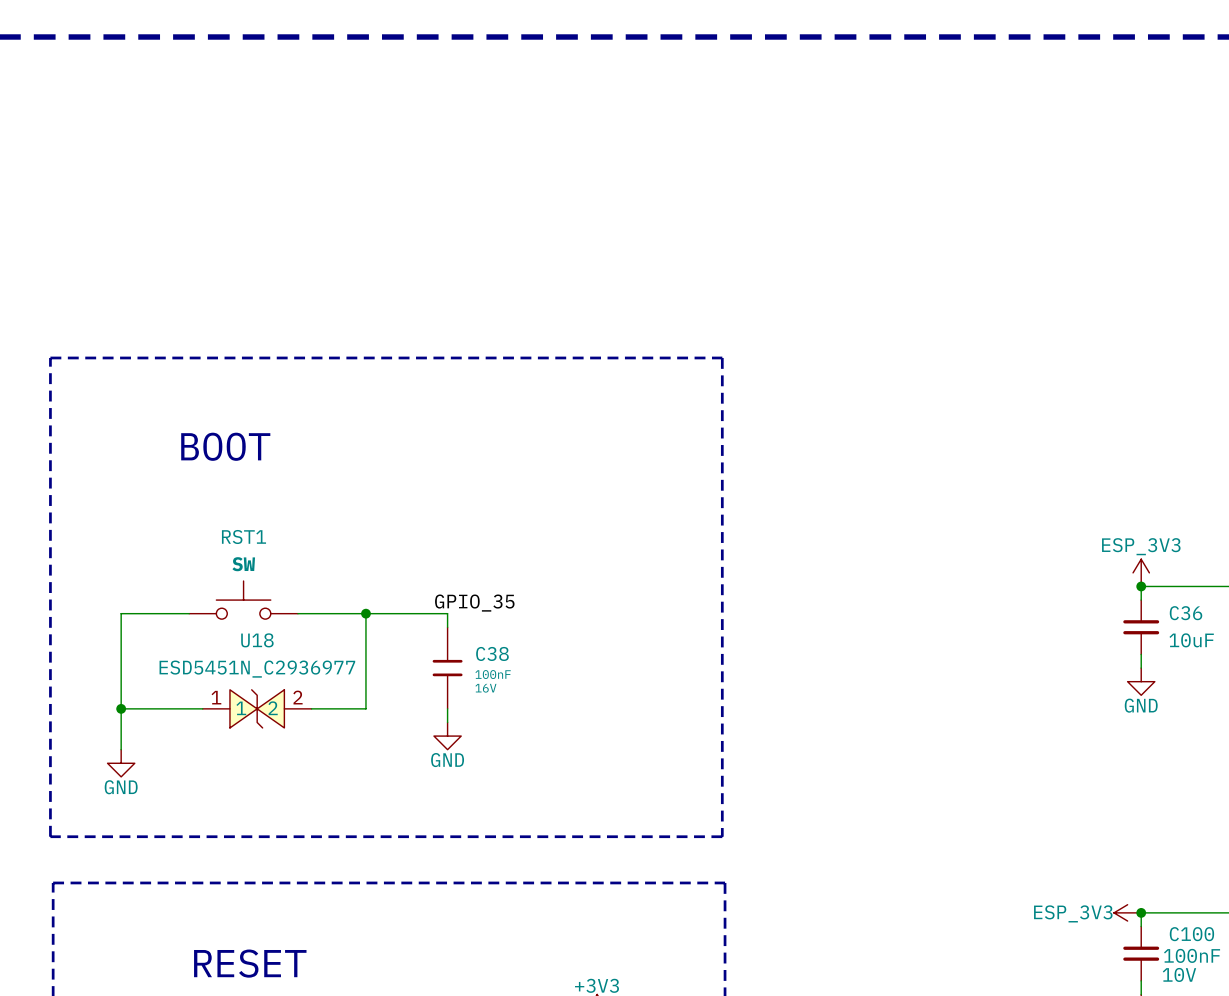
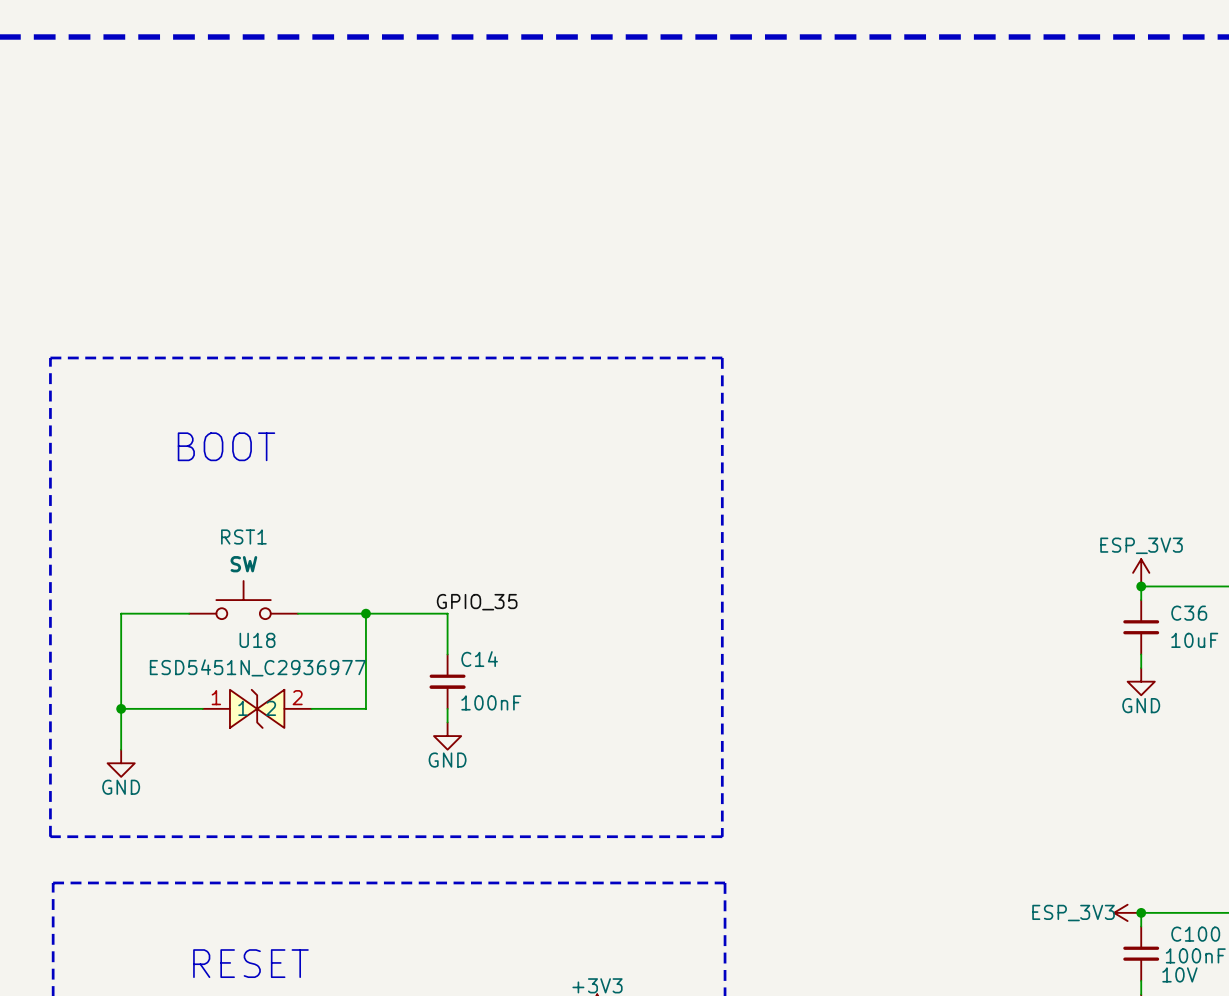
C38: 100nF (447, 668) -> none
C14: none -> 100nF (447, 681)

